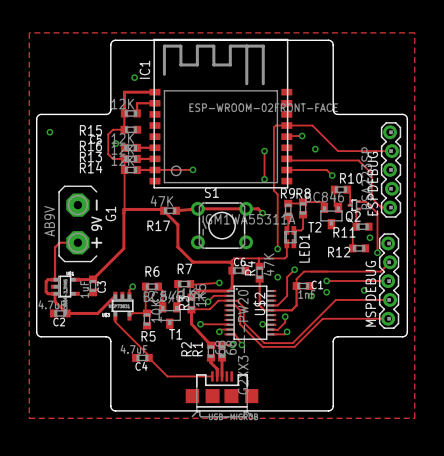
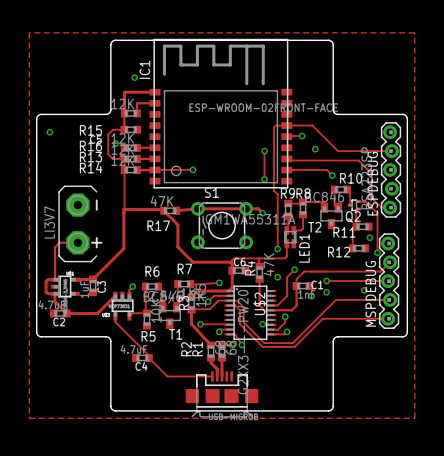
G1 name: G1 (110, 213) -> none
G1 value: AB9V (49, 221) -> LI3V7 (49, 222)
G1 text: 9V (96, 223) -> none

